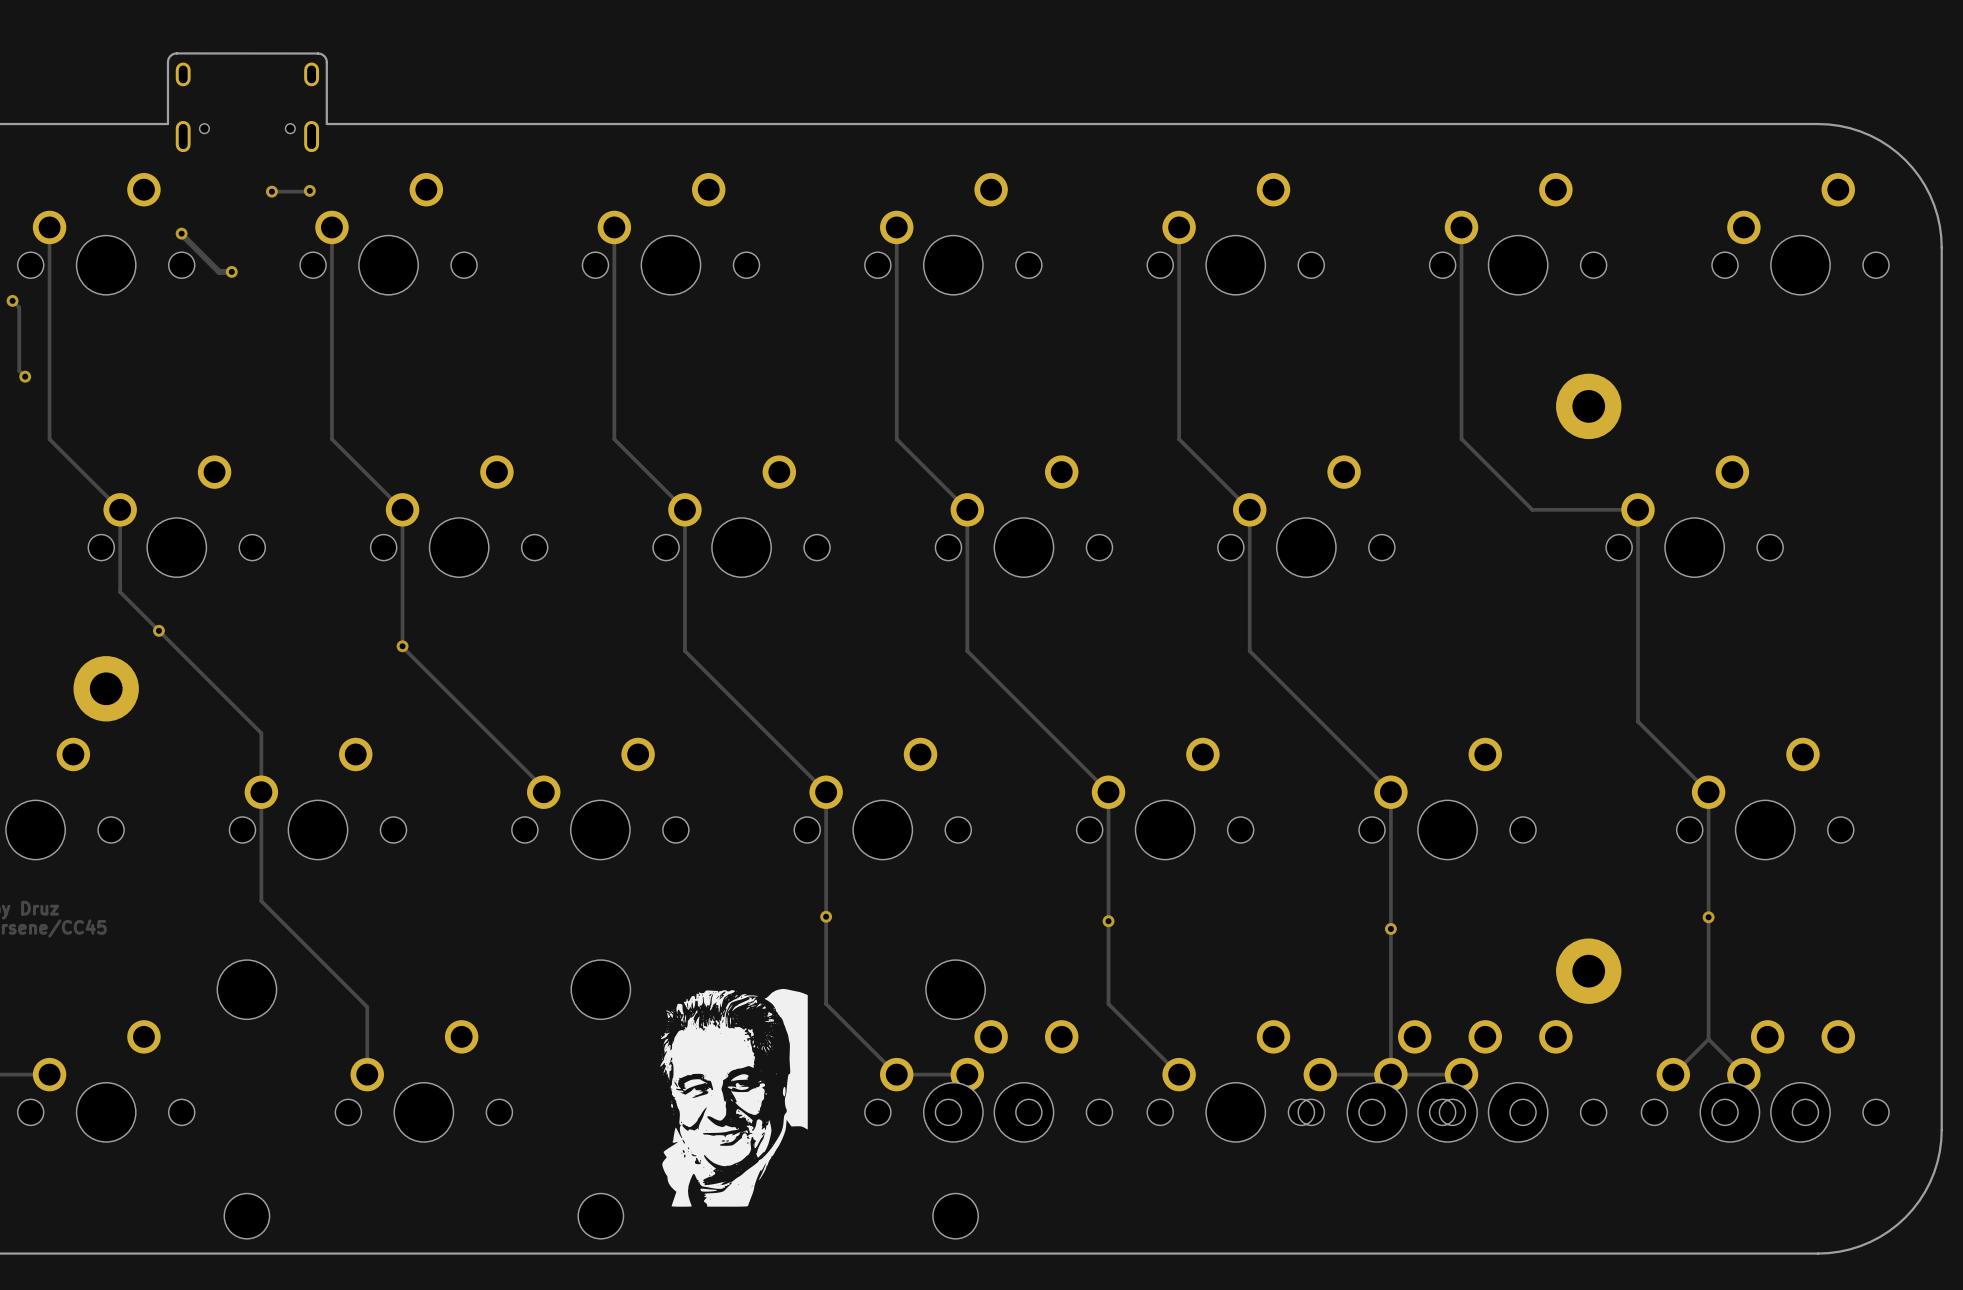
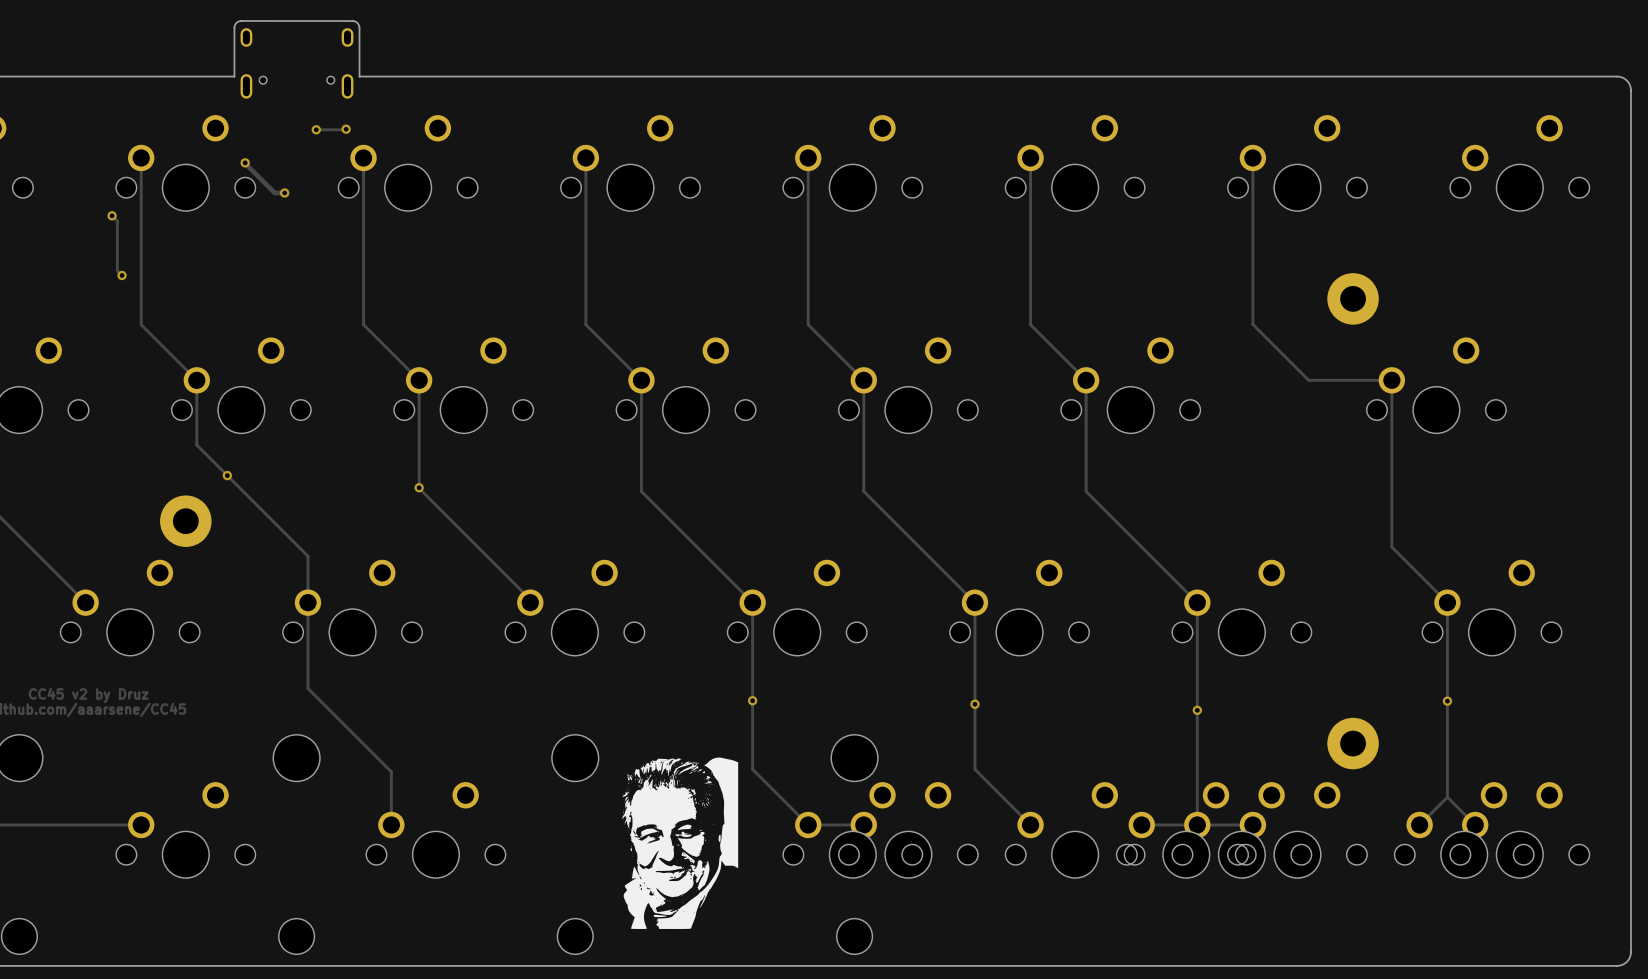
board edge: (1818, 124) (1850, 128) (1870, 135) (1889, 146) (1905, 160) (1919, 176) (1930, 195) (1939, 226) (1941, 247) -> (1533, 76) (1617, 76) (1626, 80) (1630, 90) (1630, 173)
board edge: (1941, 1130) (1939, 1151) (1930, 1182) (1919, 1200) (1905, 1217) (1889, 1231) (1870, 1241) (1850, 1249) (1818, 1253) -> (1630, 868) (1630, 951) (1626, 961) (1617, 965) (1533, 965)

